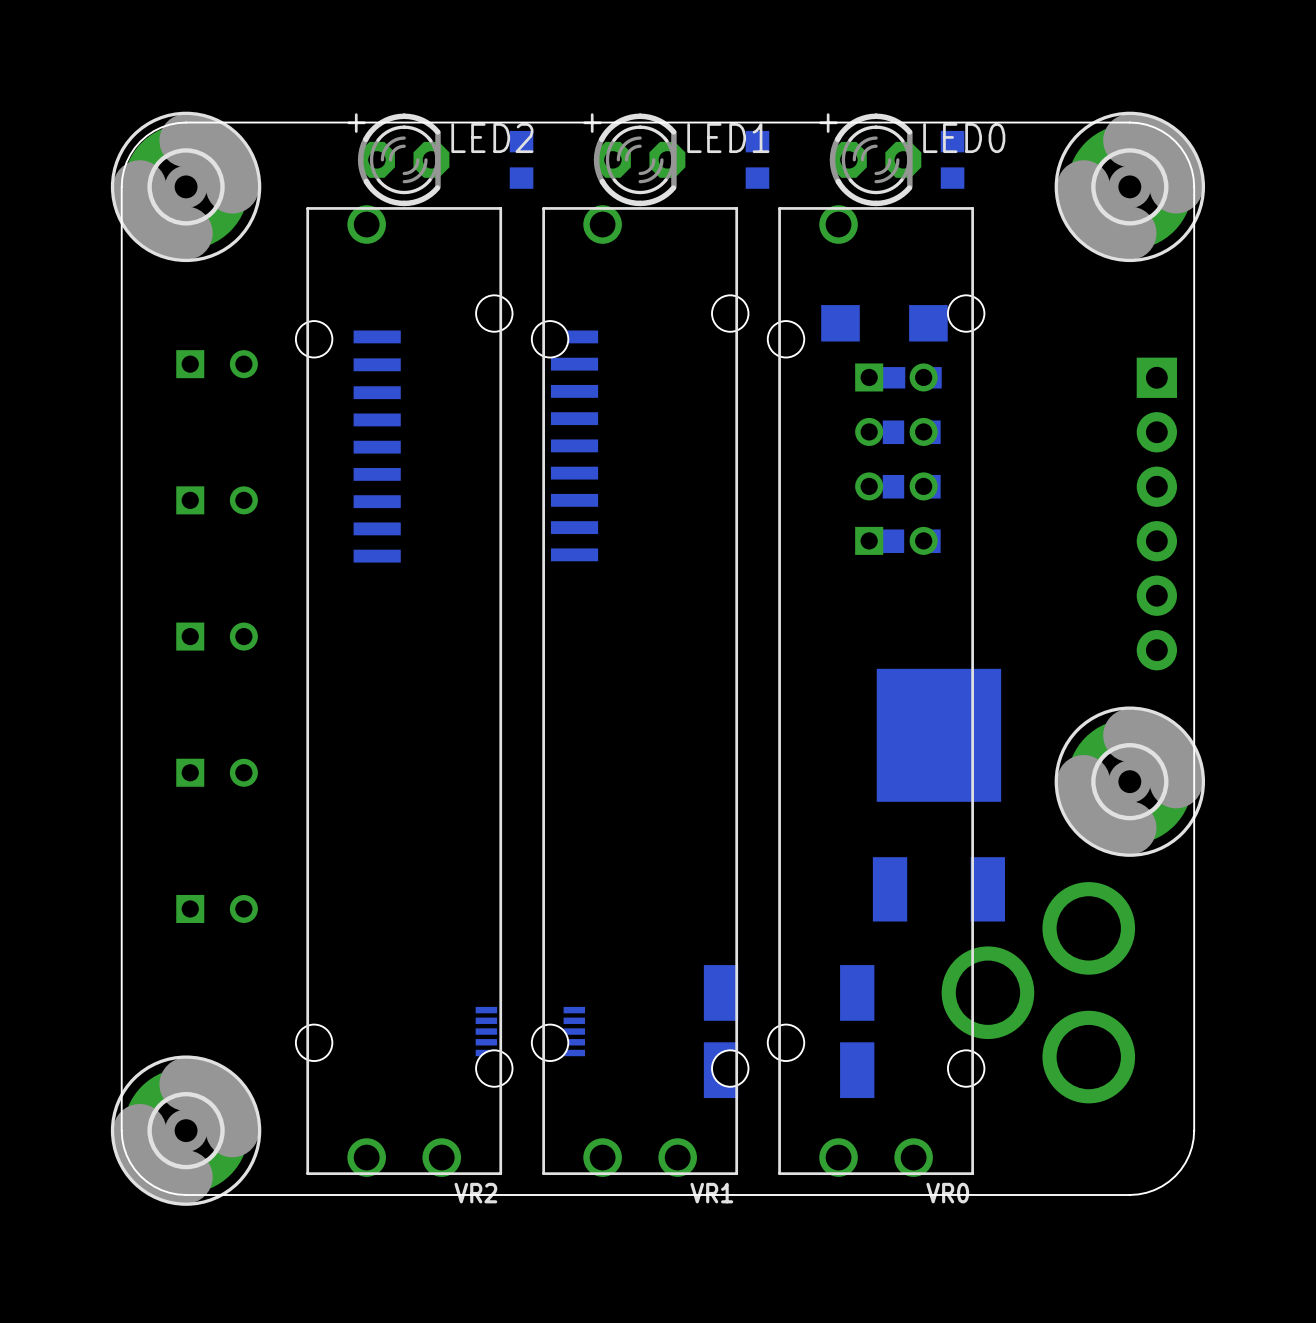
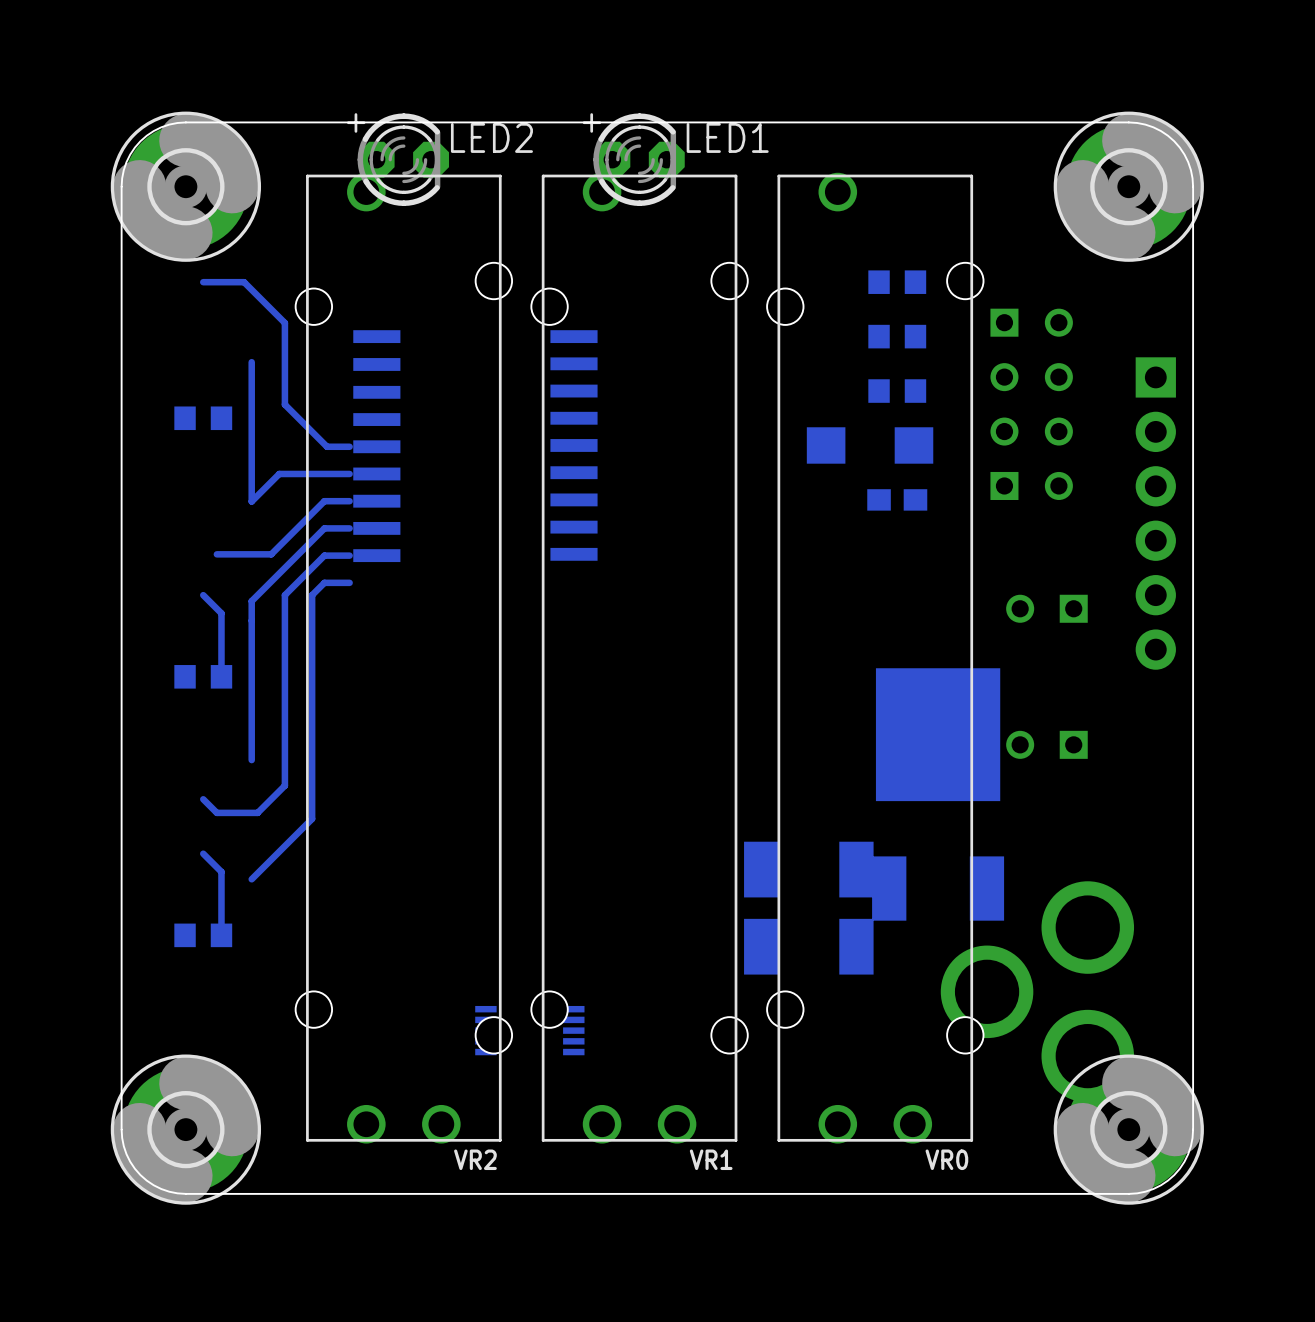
part: (521, 159) -> none
part: (757, 159) -> none
LED0: (870, 159) -> none
part: (952, 159) -> none
bottom track: none -> (203, 282) (244, 282) (284, 323) (284, 404) (327, 446) (349, 446)
part: none -> (897, 282)
part footprint: [821, 305, 948, 342] -> [868, 324, 927, 349]
bottom track: none -> (251, 362) (251, 501) (279, 473) (349, 473)
part: (217, 364) -> none
part footprint: [881, 367, 942, 389] -> [868, 379, 927, 403]
part: none -> (203, 418)
part: (911, 432) -> none
part: none -> (870, 445)
part position: (896, 459) -> (1031, 404)
part footprint: [882, 474, 941, 499] -> [867, 489, 928, 511]
part: (217, 500) -> none
bottom track: none -> (349, 501) (324, 501) (271, 554) (216, 554)
bottom track: none -> (349, 528) (324, 528) (251, 601) (251, 760)
part: (911, 541) -> none
bottom track: none -> (349, 555) (324, 555) (284, 595) (284, 785) (257, 812) (216, 812) (203, 799)
bottom track: none -> (349, 582) (324, 582) (312, 595) (312, 818) (251, 879)
bottom track: none -> (203, 595) (221, 613) (221, 676)
part: none -> (1046, 608)
part: (217, 636) -> none
part: none -> (203, 676)
VR2 position: (404, 691) -> (403, 658)
VR1 position: (640, 691) -> (639, 658)
VR0 position: (876, 691) -> (875, 658)
part: none -> (1046, 744)
part: (217, 772) -> none
part position: (1129, 781) -> (1128, 1129)
bottom track: none -> (203, 853) (221, 871) (221, 935)
part: (217, 908) -> none
part: none -> (761, 908)
part: none -> (856, 908)
part: none -> (203, 935)
part: (721, 1031) -> none
part: (857, 1031) -> none

